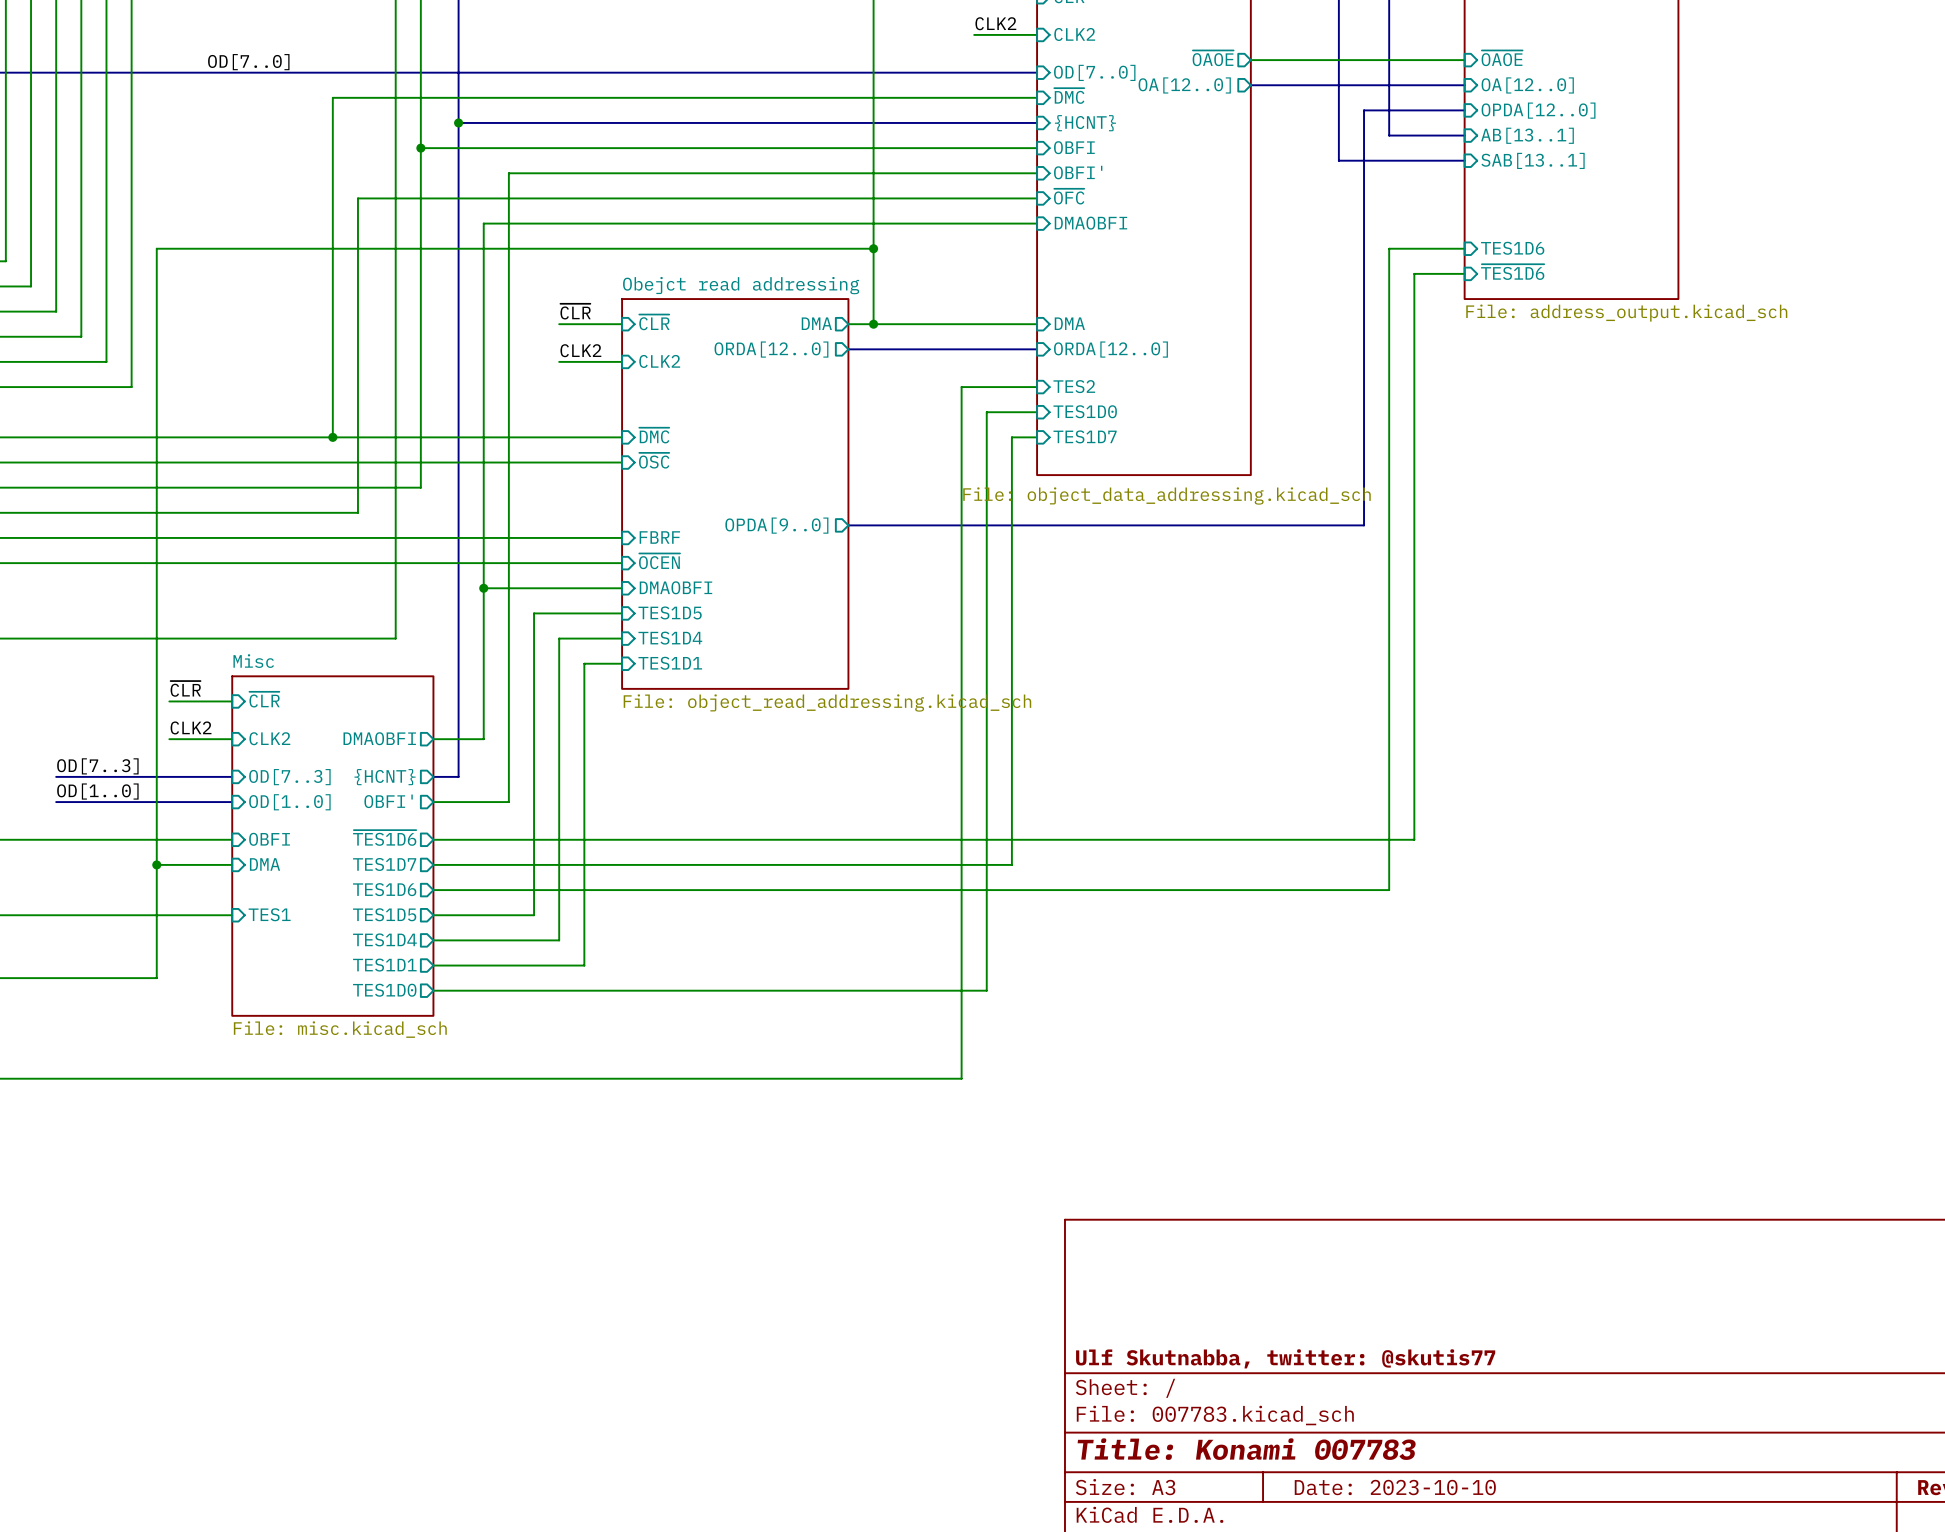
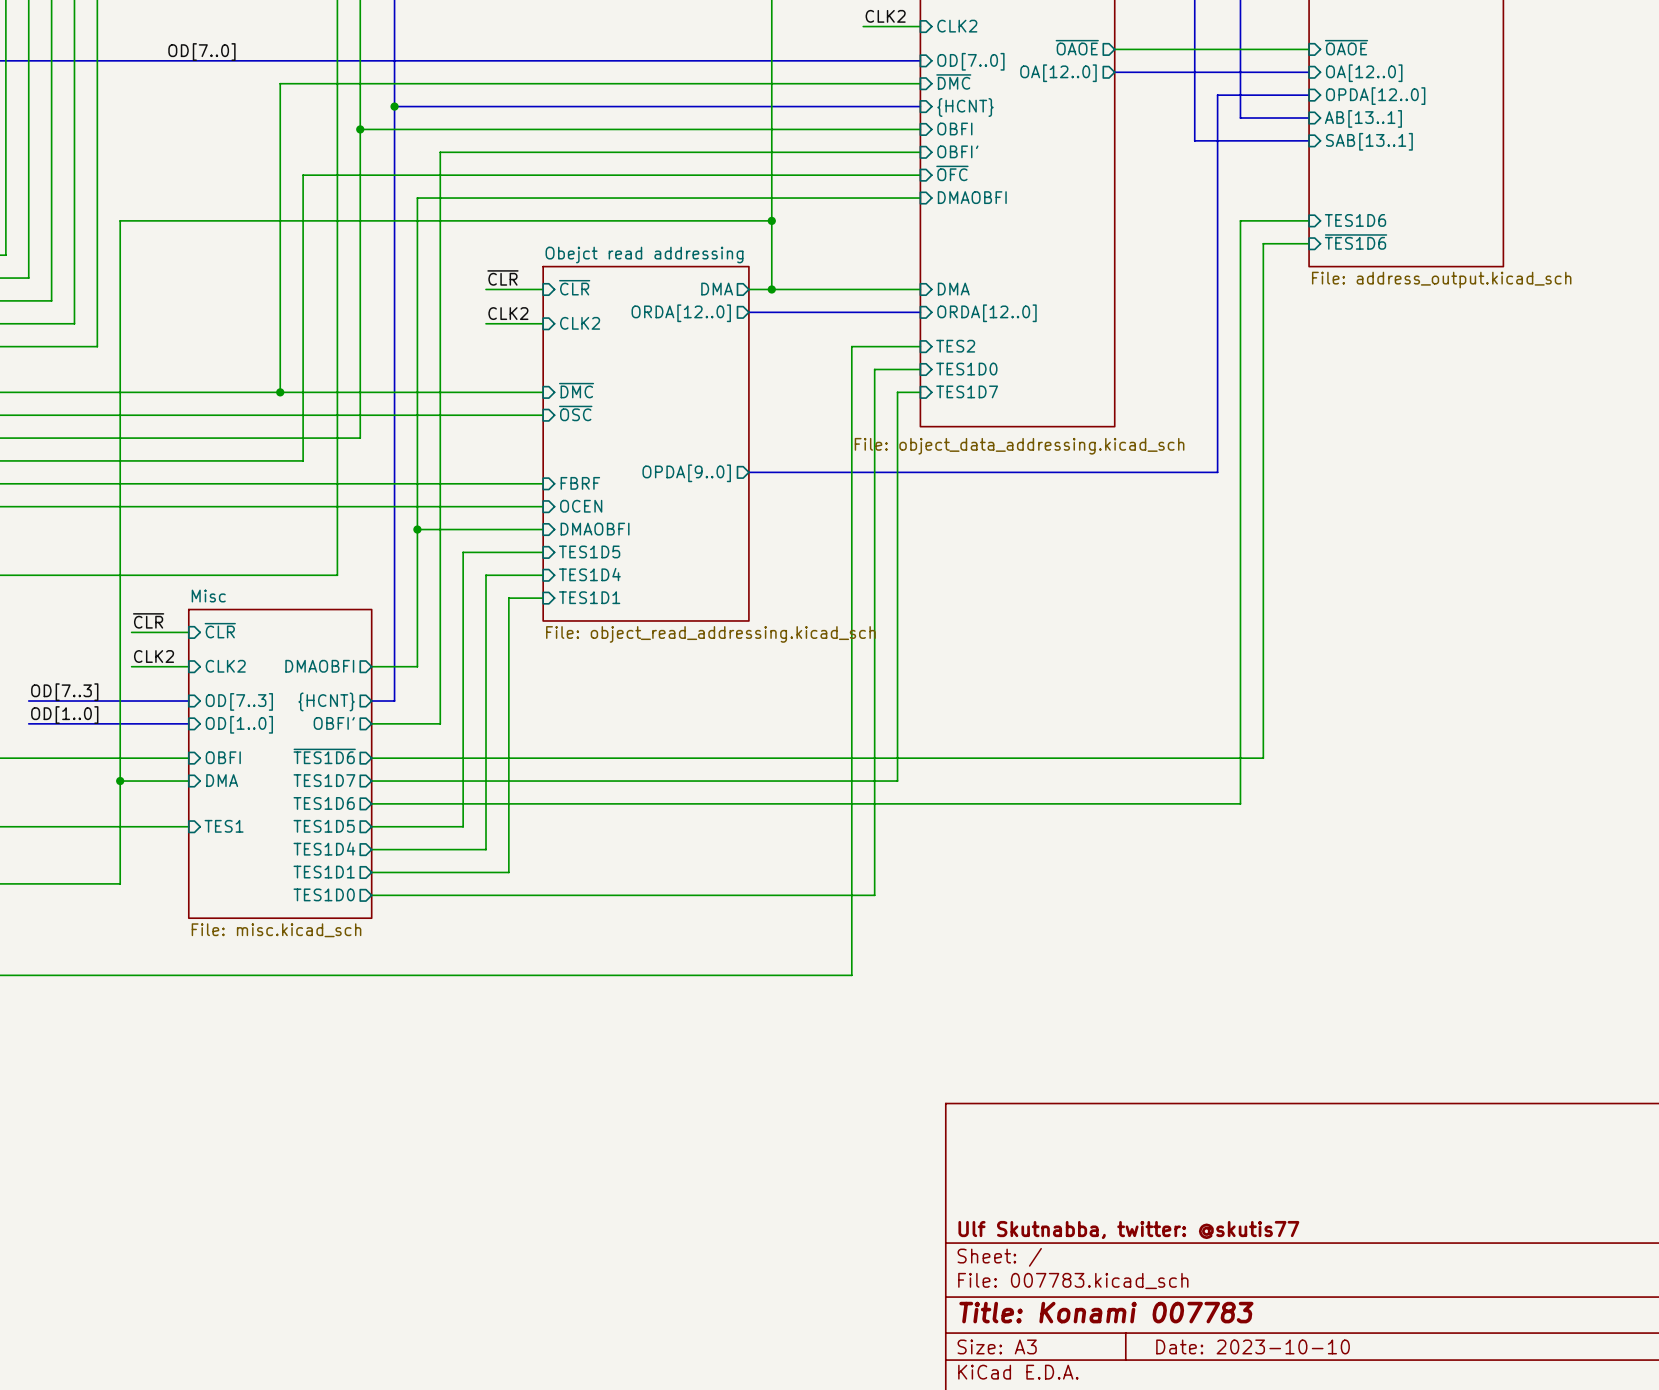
sheet pin: ~{OCEN} (659, 561) -> OCEN (581, 506)

